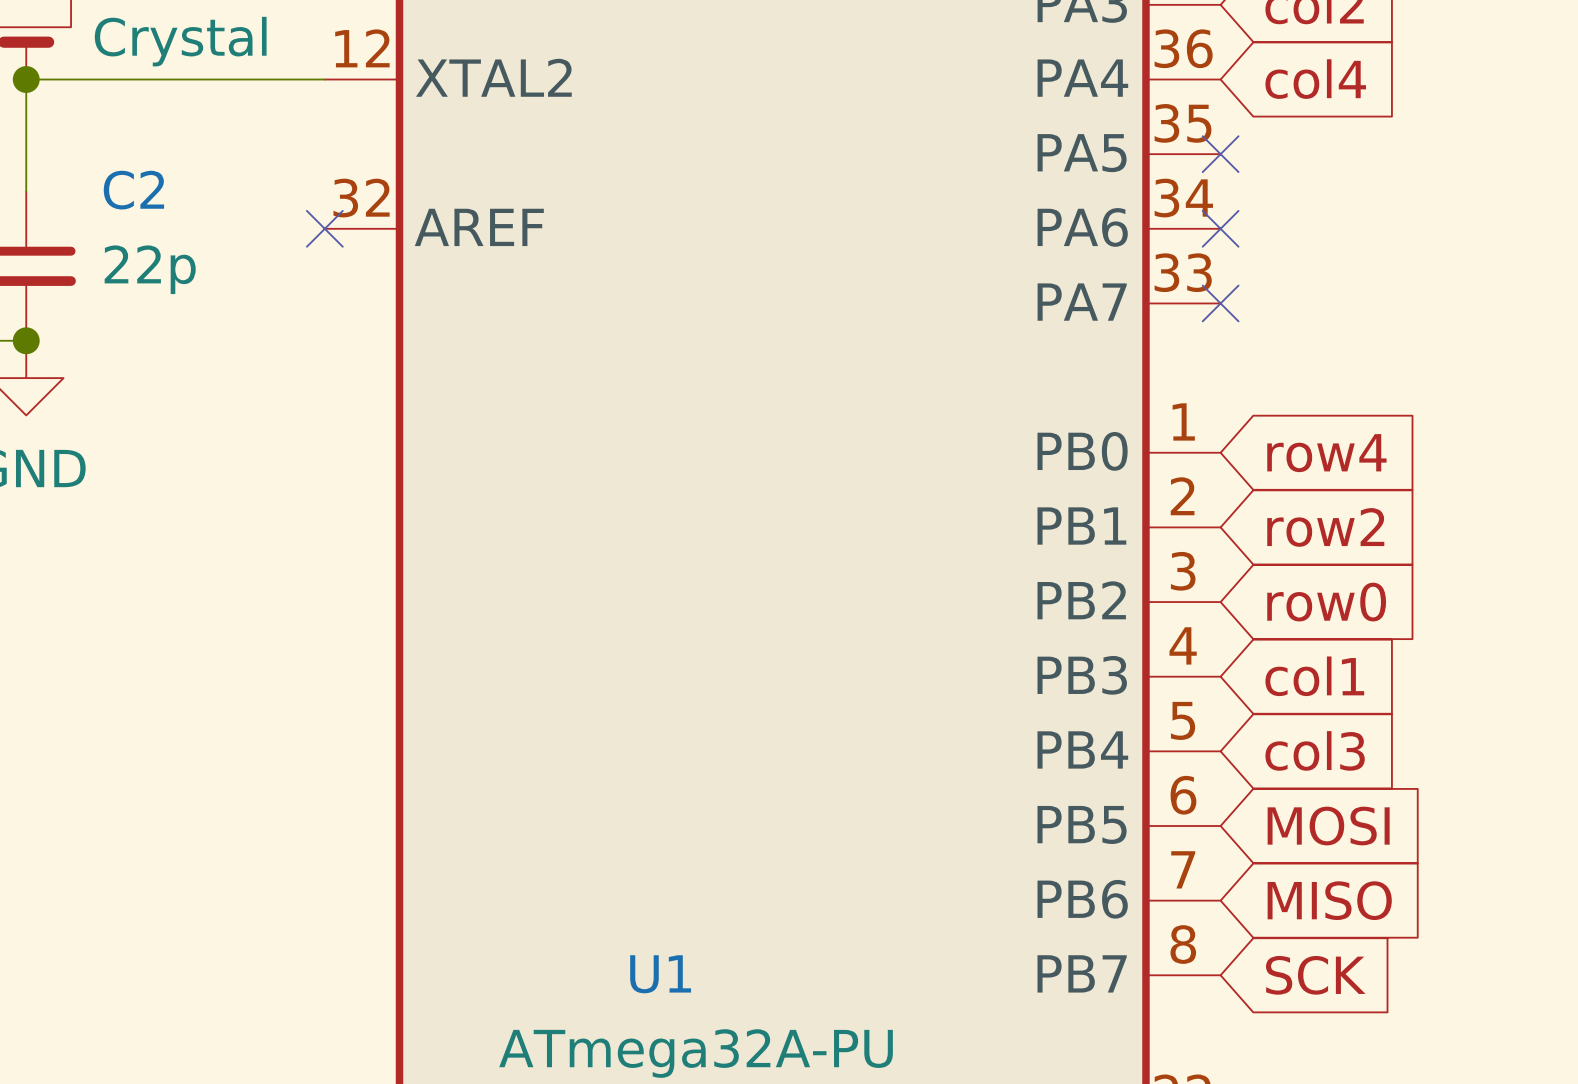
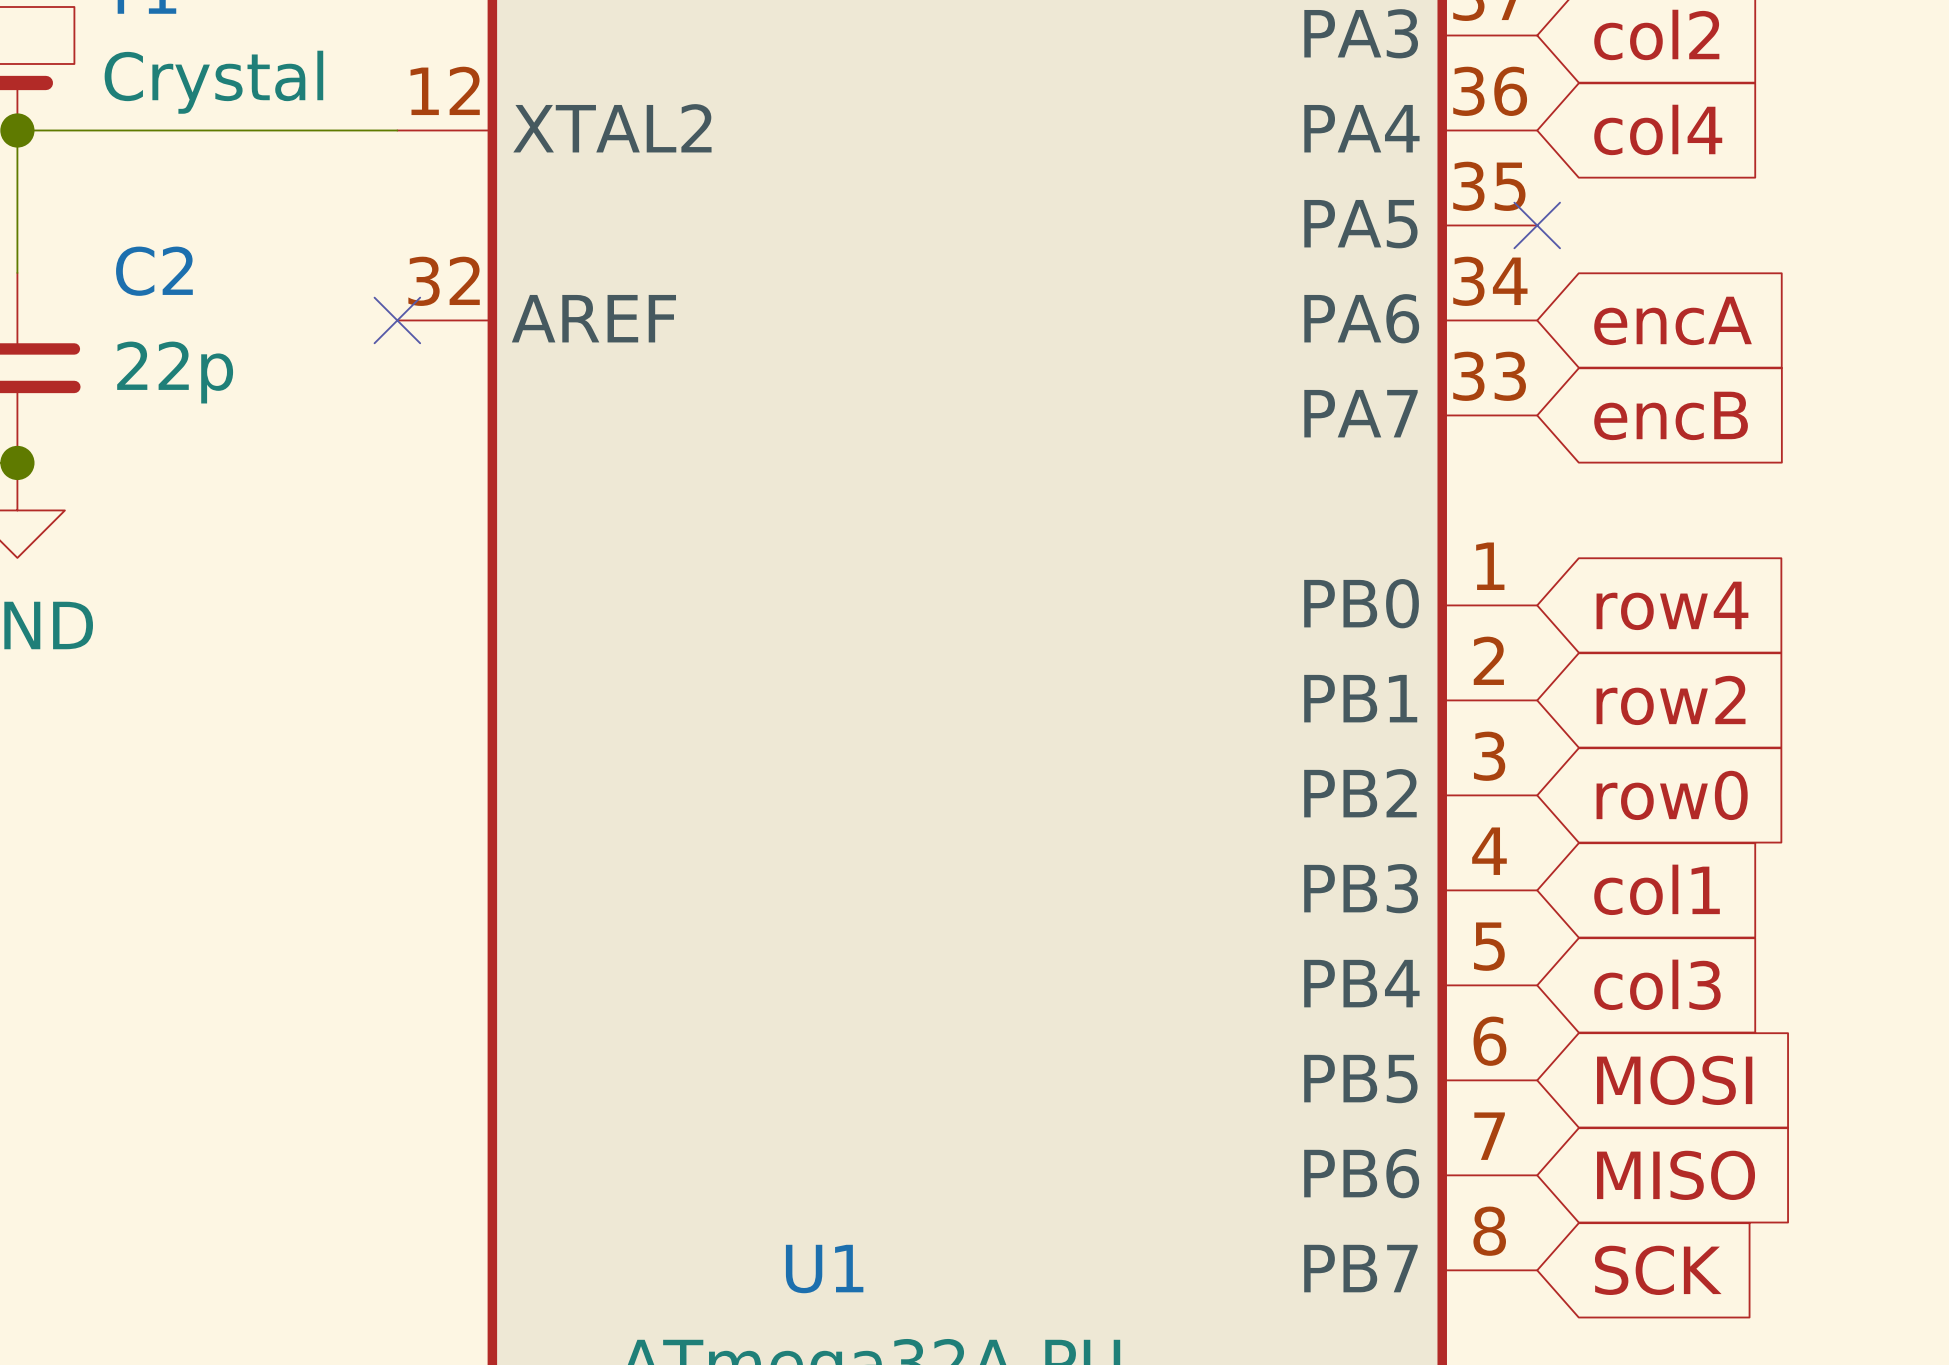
no-connect mark: (1220, 228) -> none
global label: none -> encA (1673, 320)
no-connect mark: (1220, 303) -> none
global label: none -> encB (1671, 415)

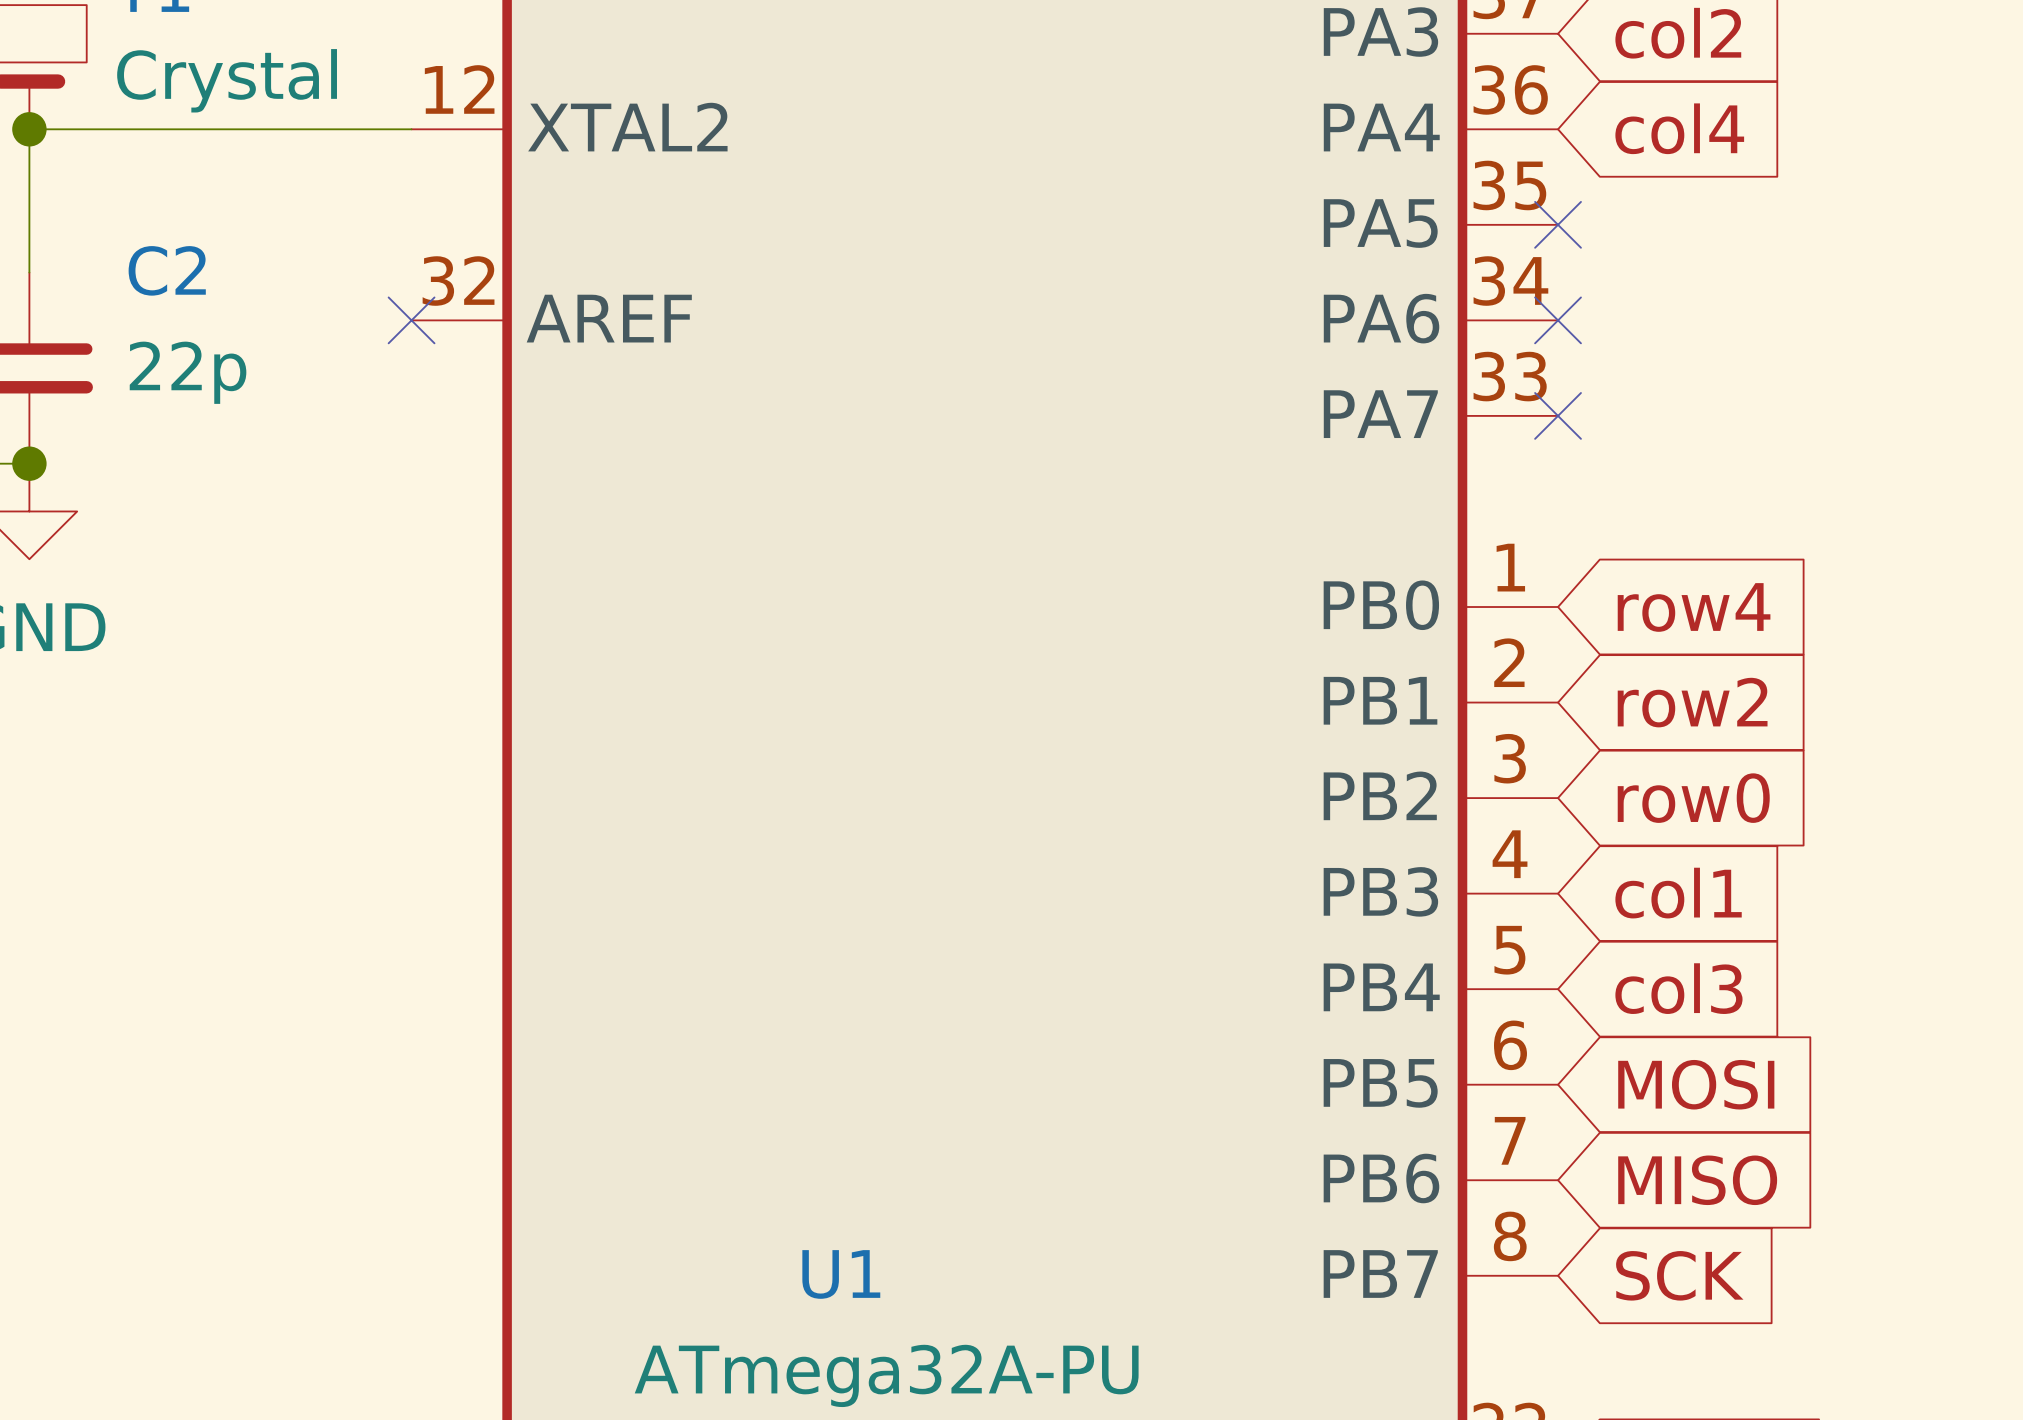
no-connect mark: none -> (1558, 320)
global label: encA (1673, 320) -> none
no-connect mark: none -> (1558, 415)
global label: encB (1671, 415) -> none

